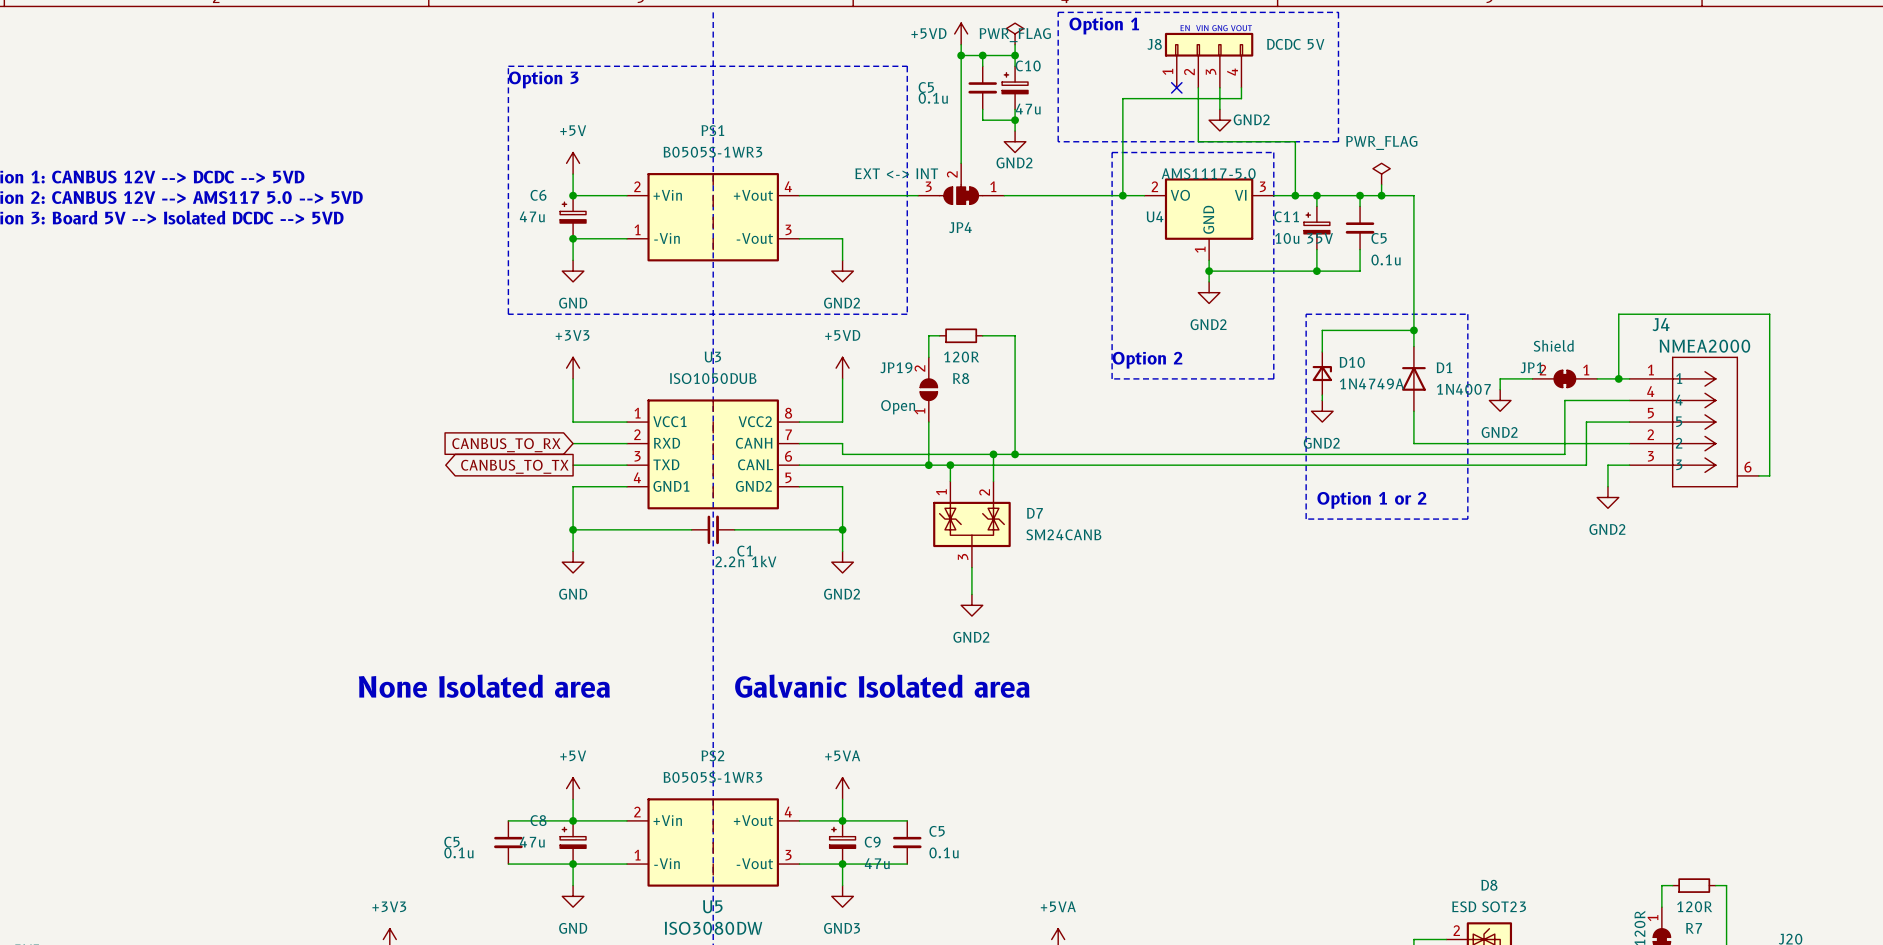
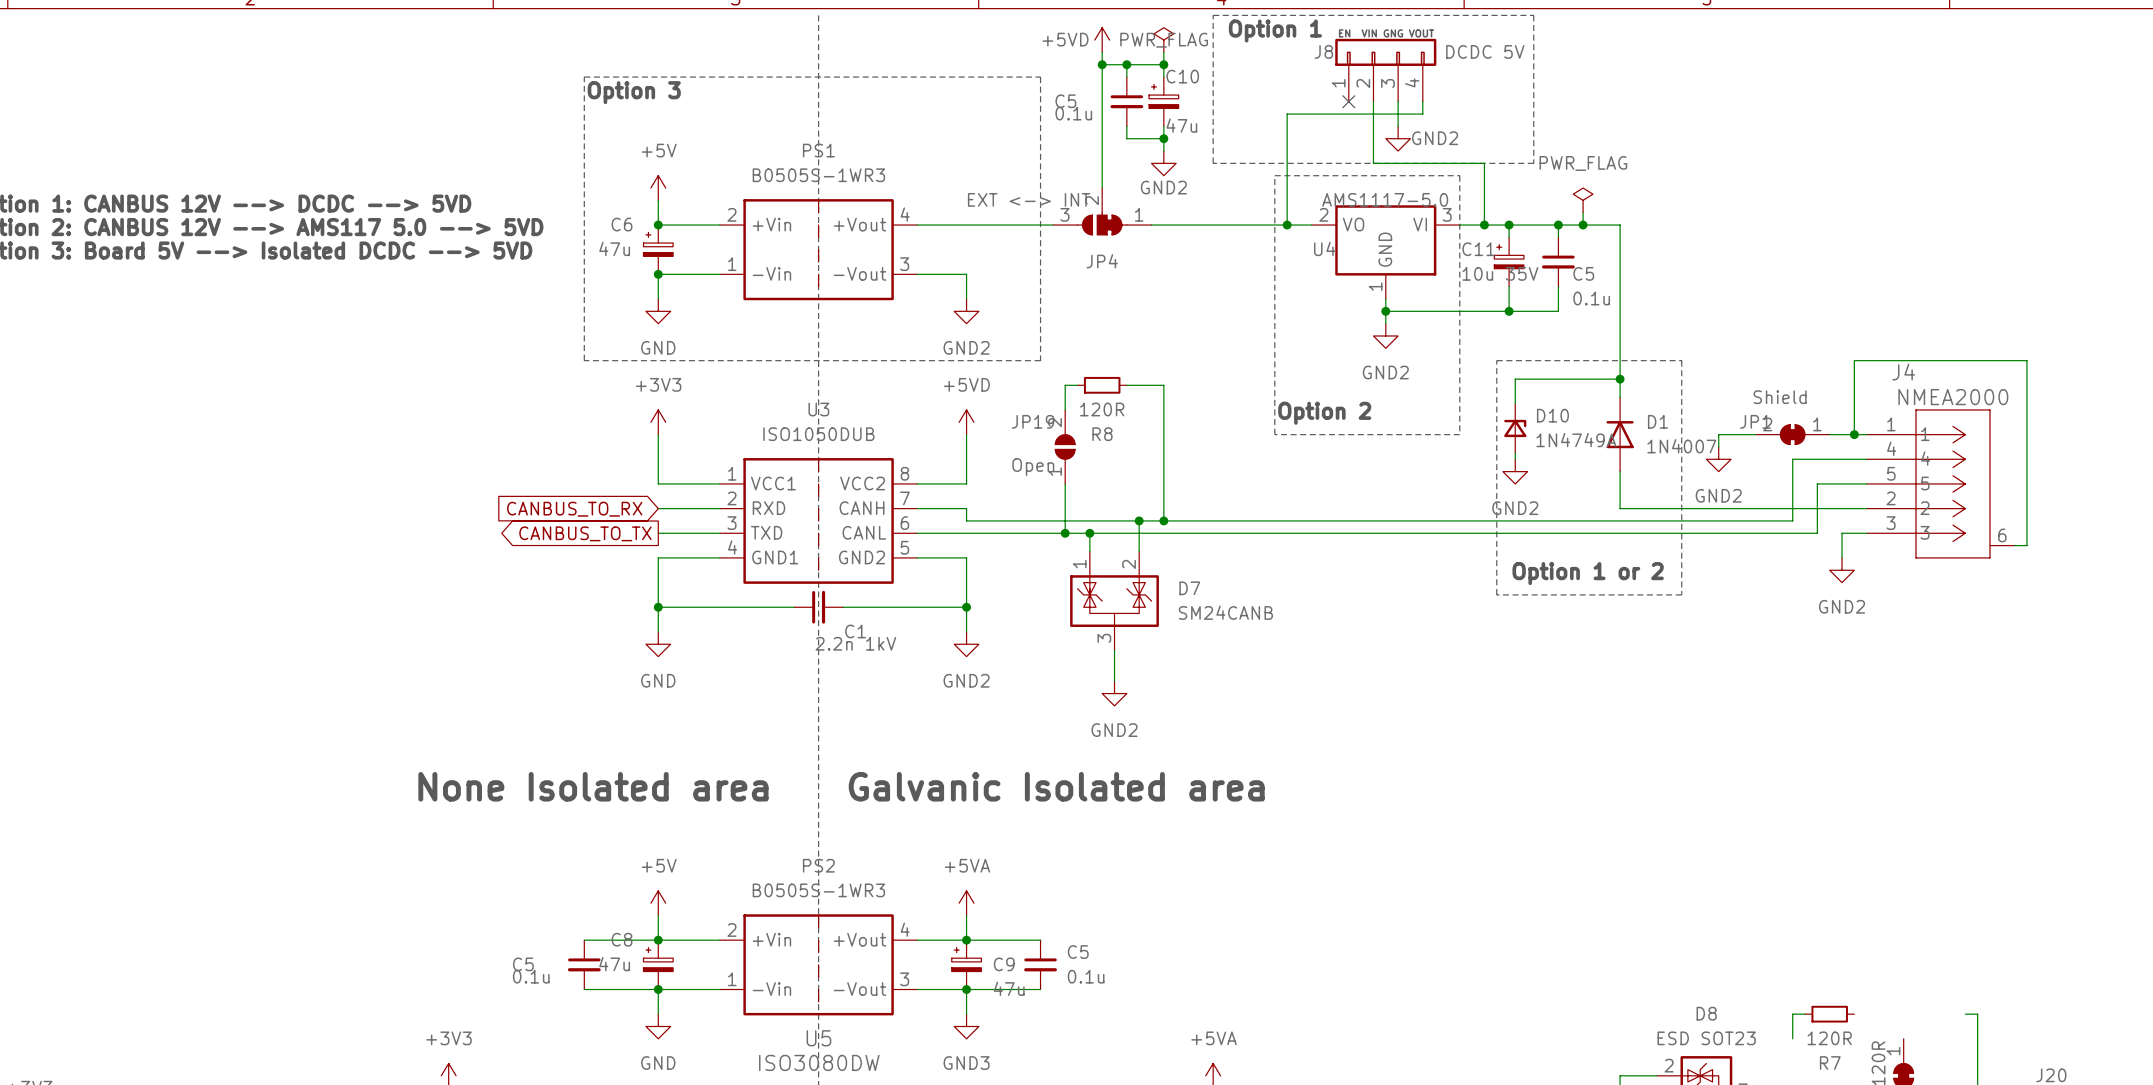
wire: (1672, 885) (1661, 885) (1661, 907) -> (1805, 1014) (1792, 1014) (1792, 1038)
R7 position: (1694, 885) -> (1829, 1014)

